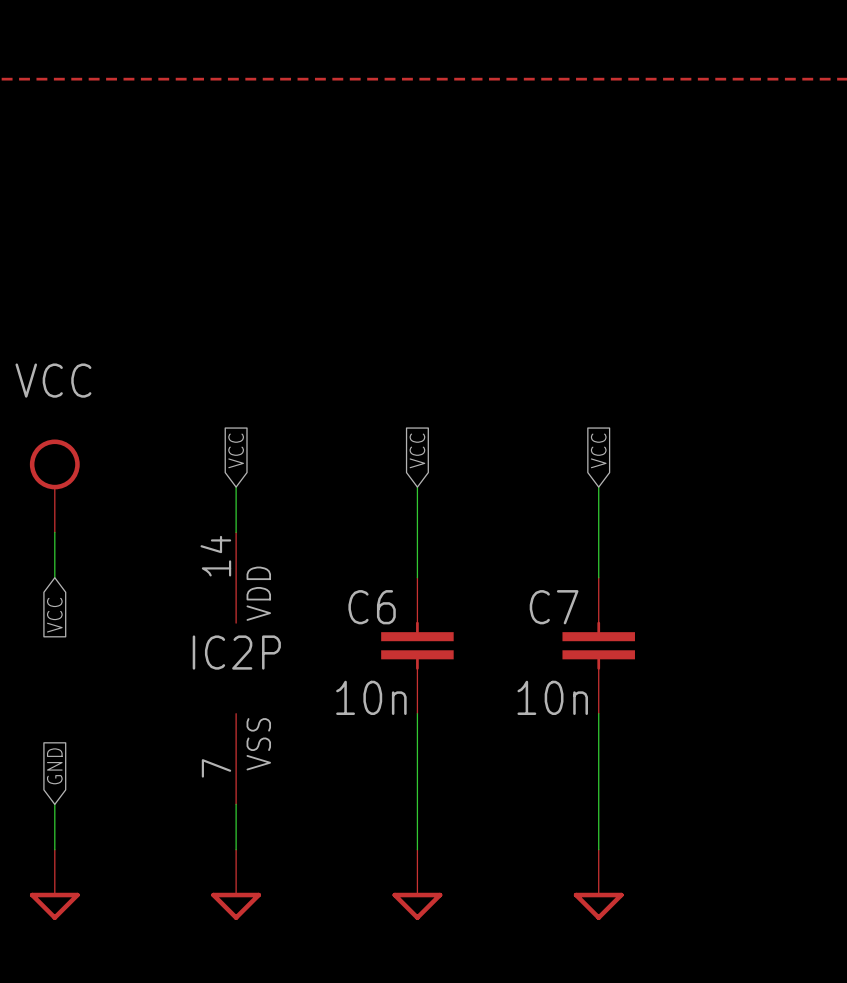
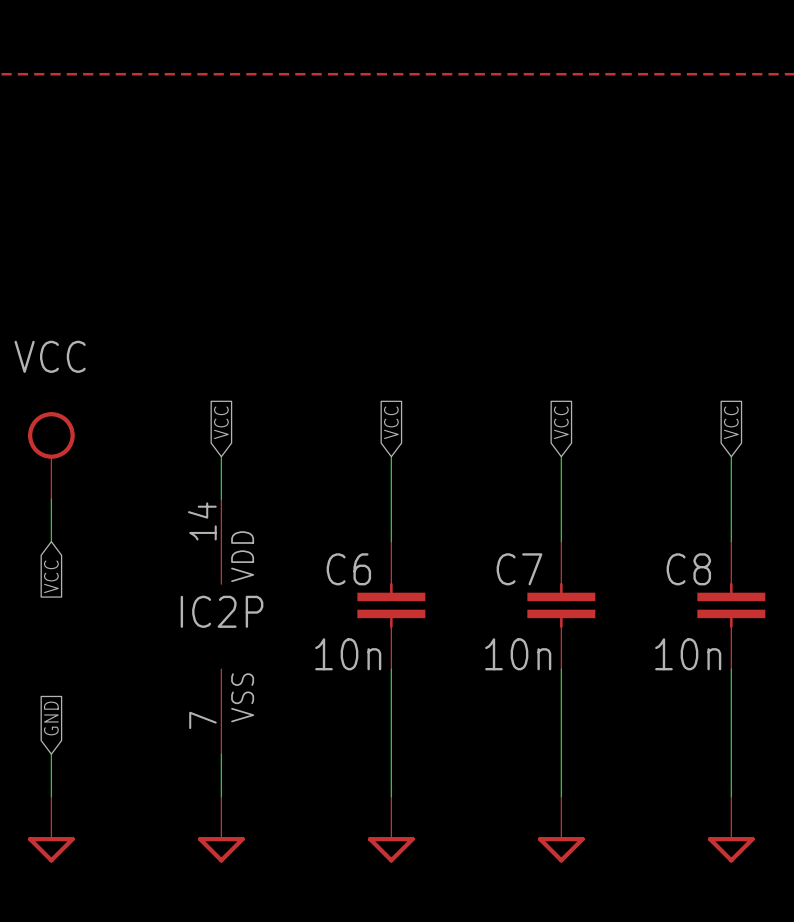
global label: none -> VCC (731, 422)
wire: none -> (731, 456) (731, 541)
C8: none -> 10n (731, 605)
wire: none -> (731, 669) (731, 796)
power symbol: none -> (731, 829)

